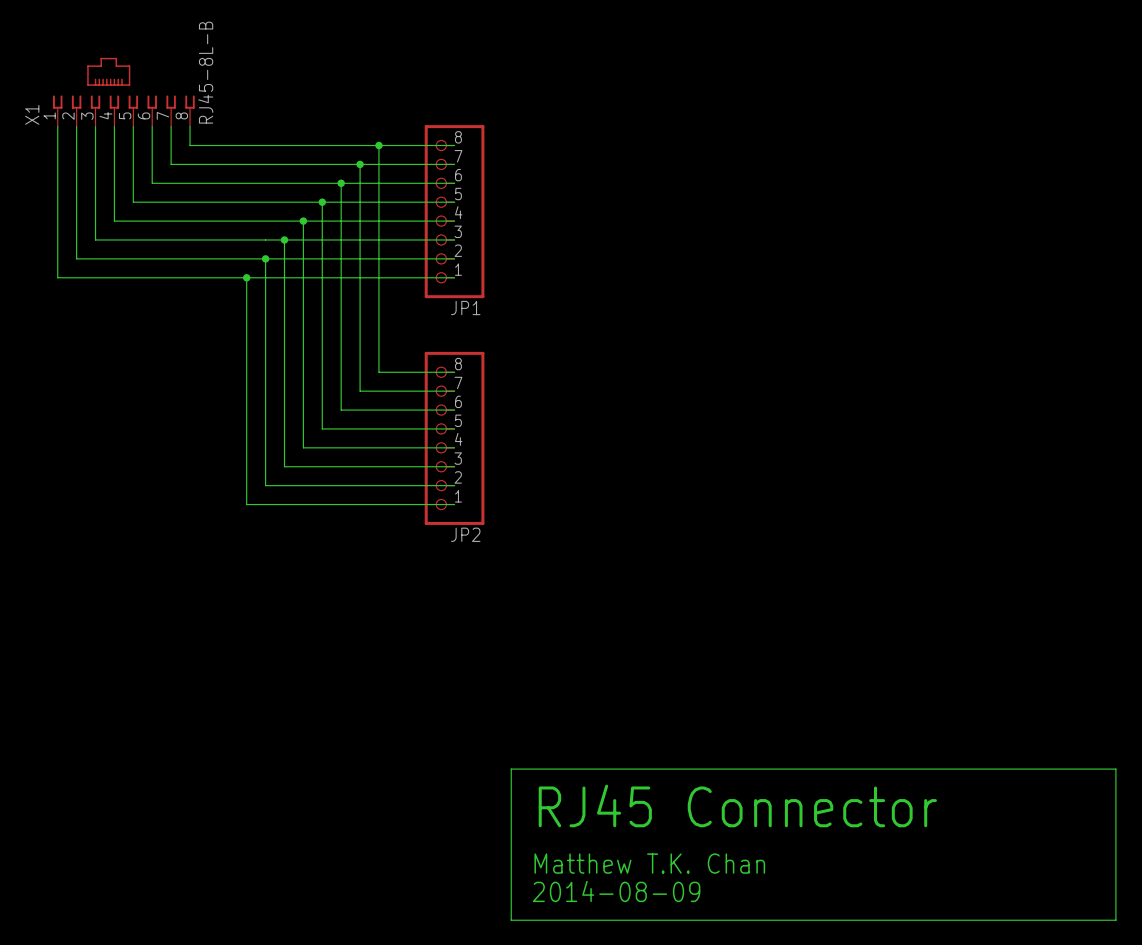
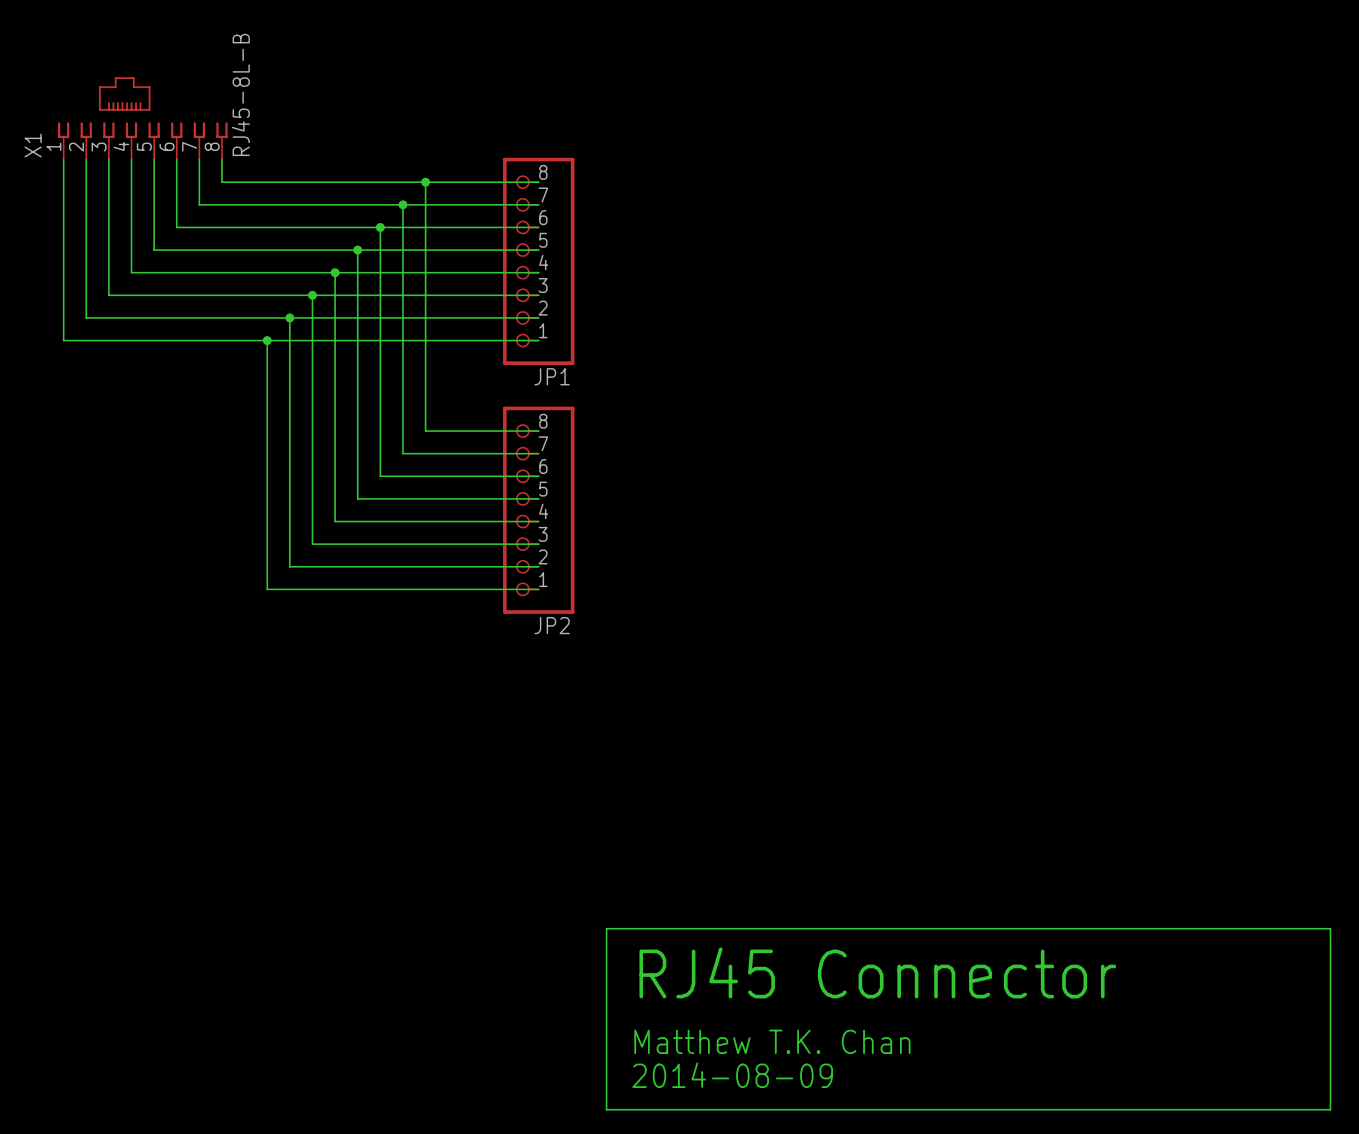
wire: none -> (425, 182) (425, 204)
junction: none -> (425, 182)
wire: (378, 145) (378, 372) -> none
junction: (378, 145) -> none
wire: none -> (402, 204) (402, 227)
junction: none -> (402, 204)
junction: (360, 164) -> none
wire: none -> (380, 227) (380, 250)
junction: none -> (380, 227)
junction: (341, 183) -> none
wire: none -> (357, 250) (357, 272)
junction: none -> (357, 250)
junction: (322, 202) -> none
wire: none -> (335, 272) (335, 295)
junction: none -> (335, 272)
junction: (303, 221) -> none
wire: none -> (312, 295) (312, 317)
junction: none -> (312, 295)
junction: (284, 239) -> none
wire: none -> (289, 317) (289, 340)
junction: none -> (289, 317)
junction: (265, 258) -> none
junction: none -> (267, 340)
junction: (246, 277) -> none
wire: (360, 353) (360, 391) -> (380, 476) (425, 476)
wire: none -> (425, 431) (538, 431)
wire: (341, 372) (341, 410) -> (402, 453) (448, 453)
wire: (322, 391) (322, 428) -> (335, 521) (380, 521)
wire: (303, 410) (303, 447) -> (312, 544) (357, 544)
wire: none -> (357, 498) (402, 498)
wire: (284, 428) (284, 466) -> (289, 566) (335, 566)
JP2 position: (454, 438) -> (538, 510)
wire: (265, 447) (265, 485) -> (267, 340) (267, 589) (312, 589)
wire: (246, 466) (246, 504) (454, 504) -> none

